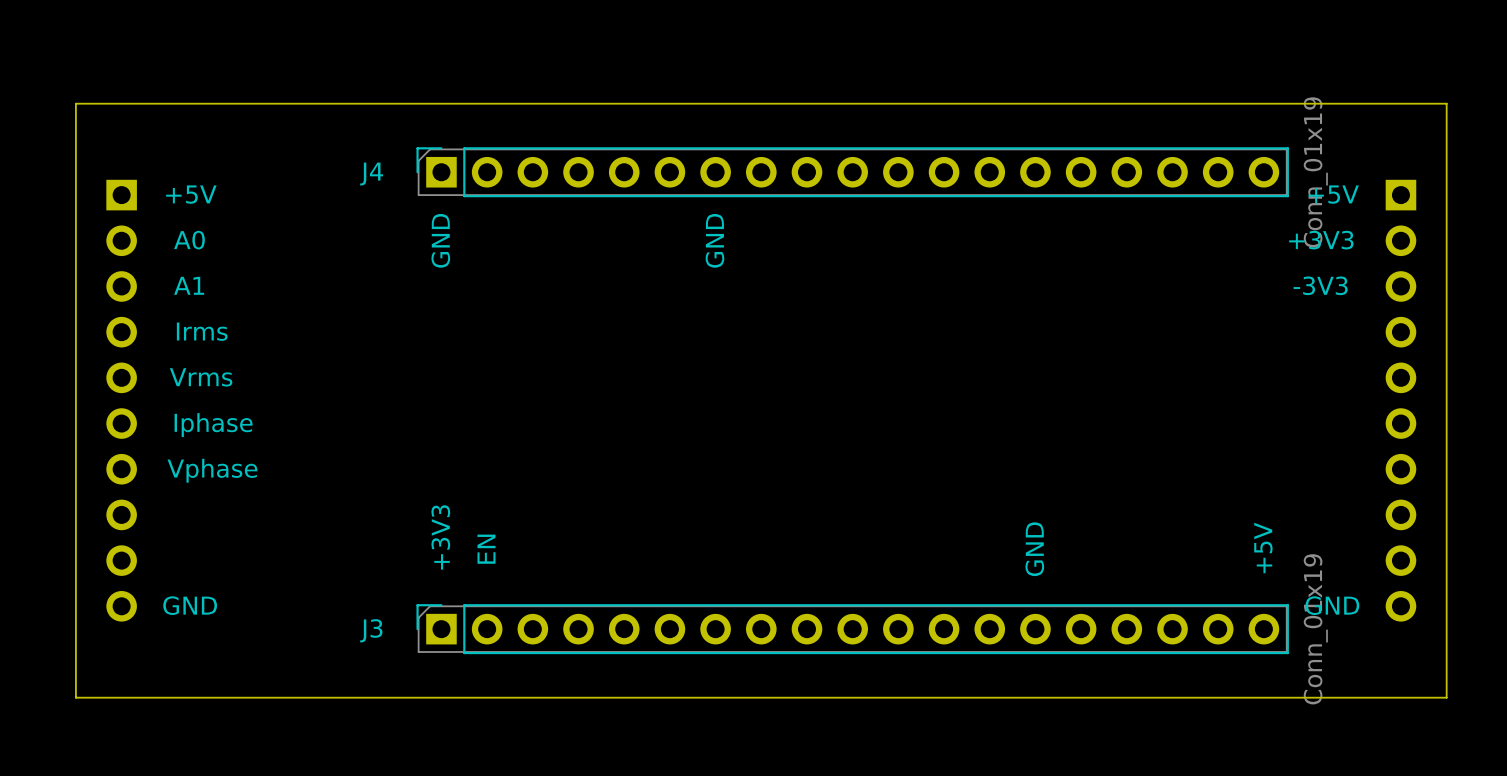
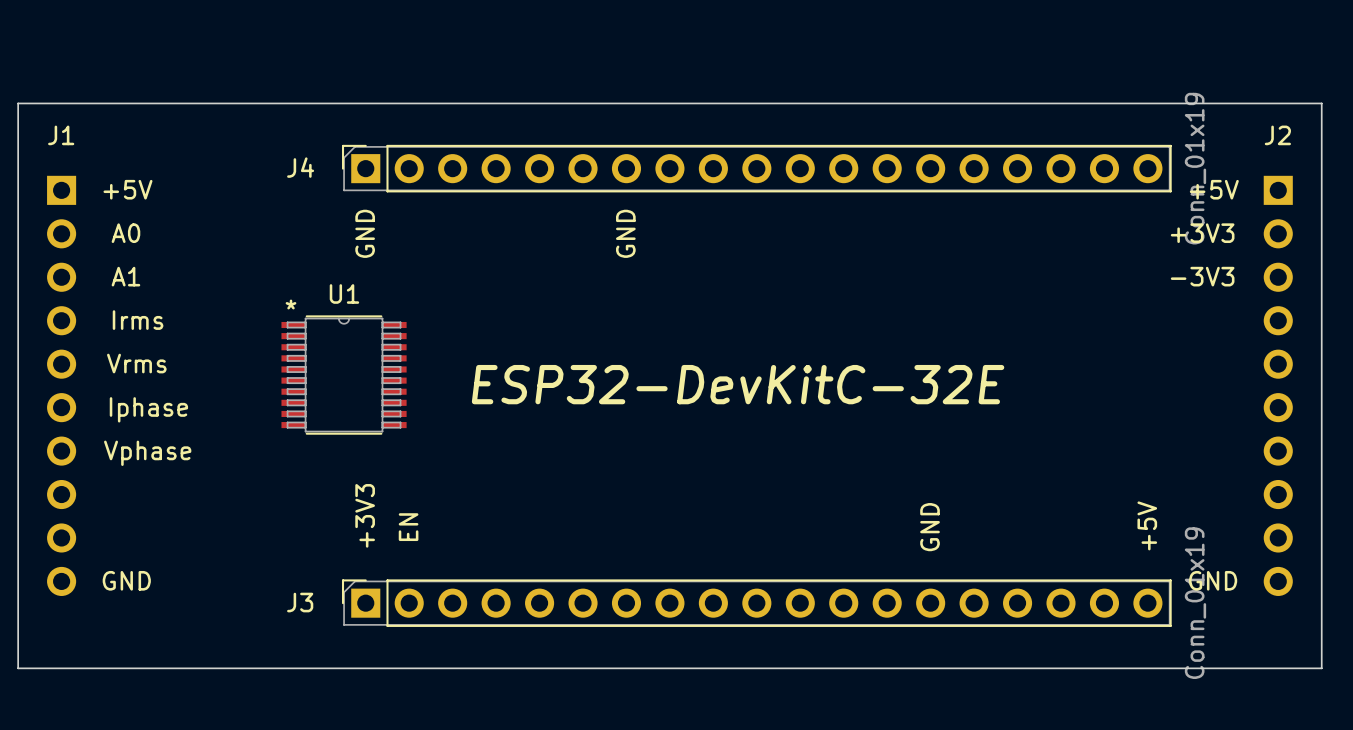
J1 name: none -> J1 (61, 135)
J2 name: none -> J2 (1277, 135)
U1: none -> (344, 375)
text: none -> ESP32-DevKitC-32E (738, 384)

